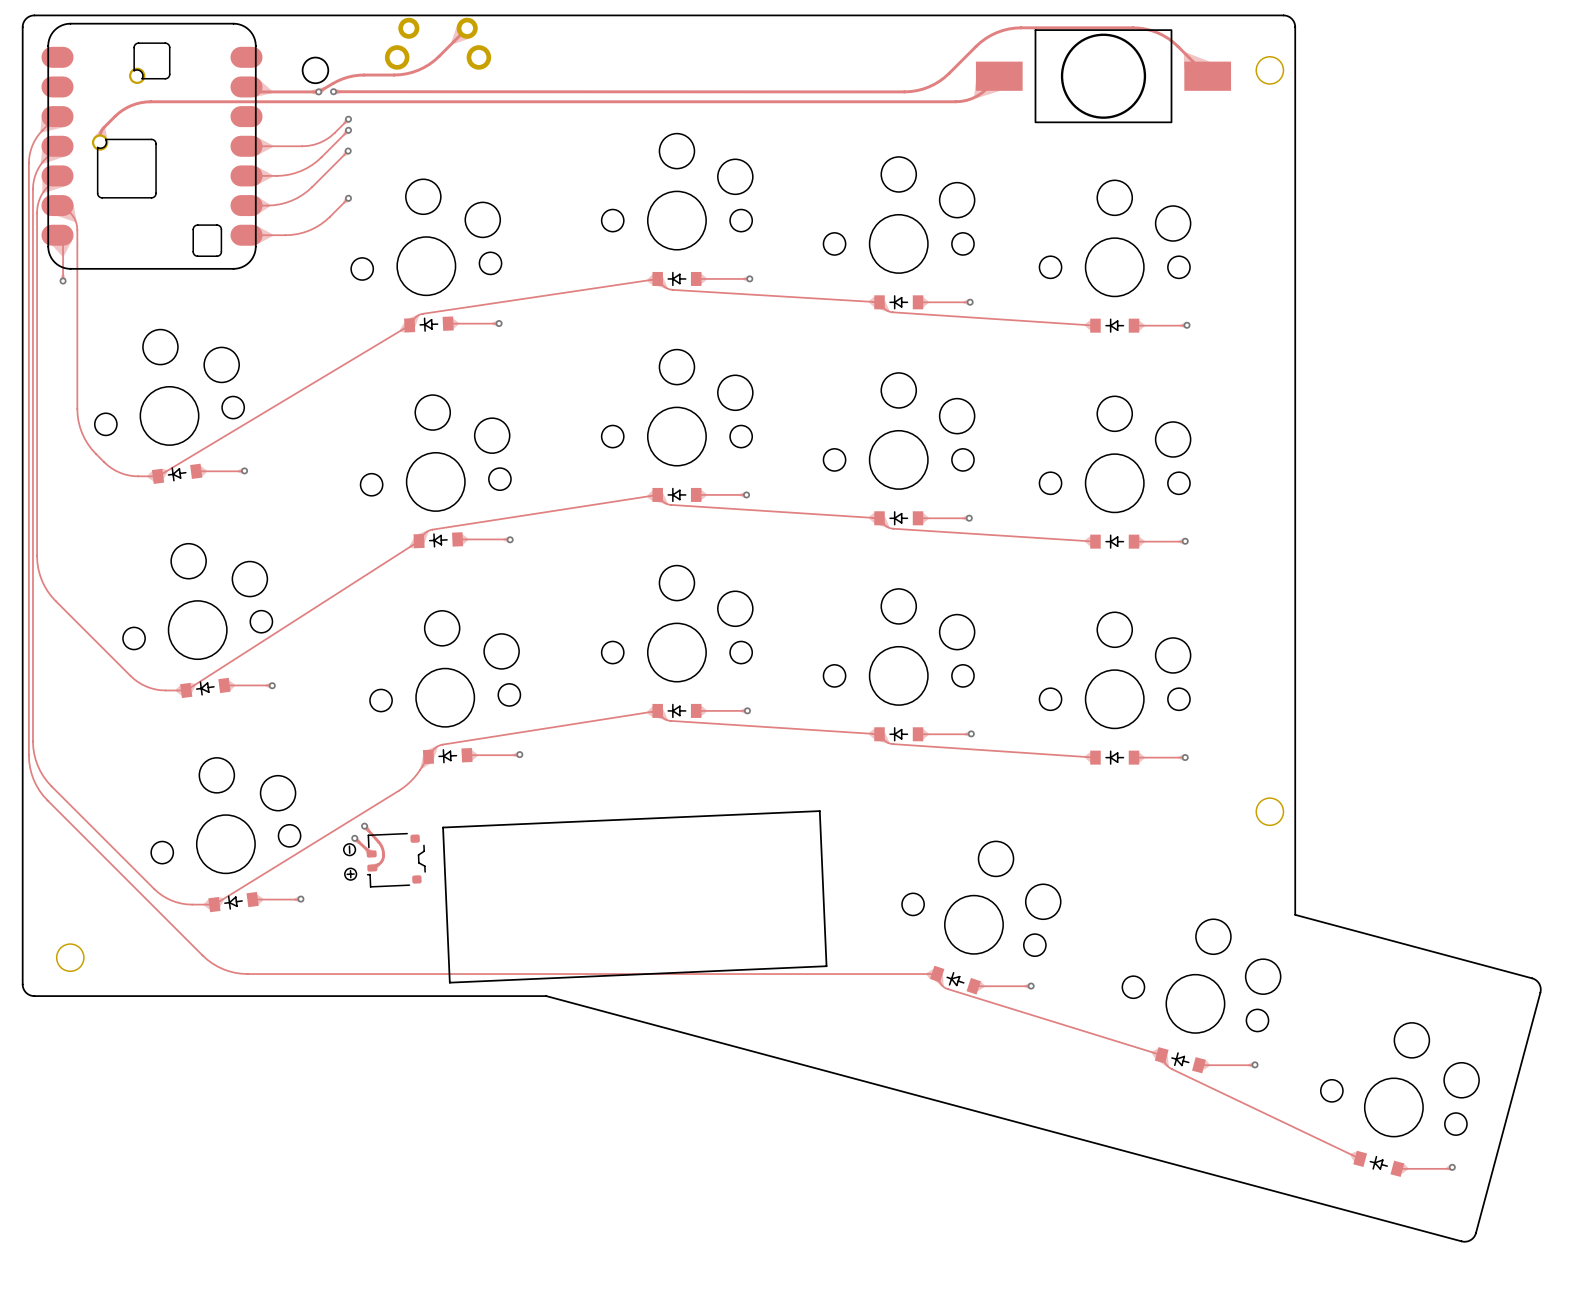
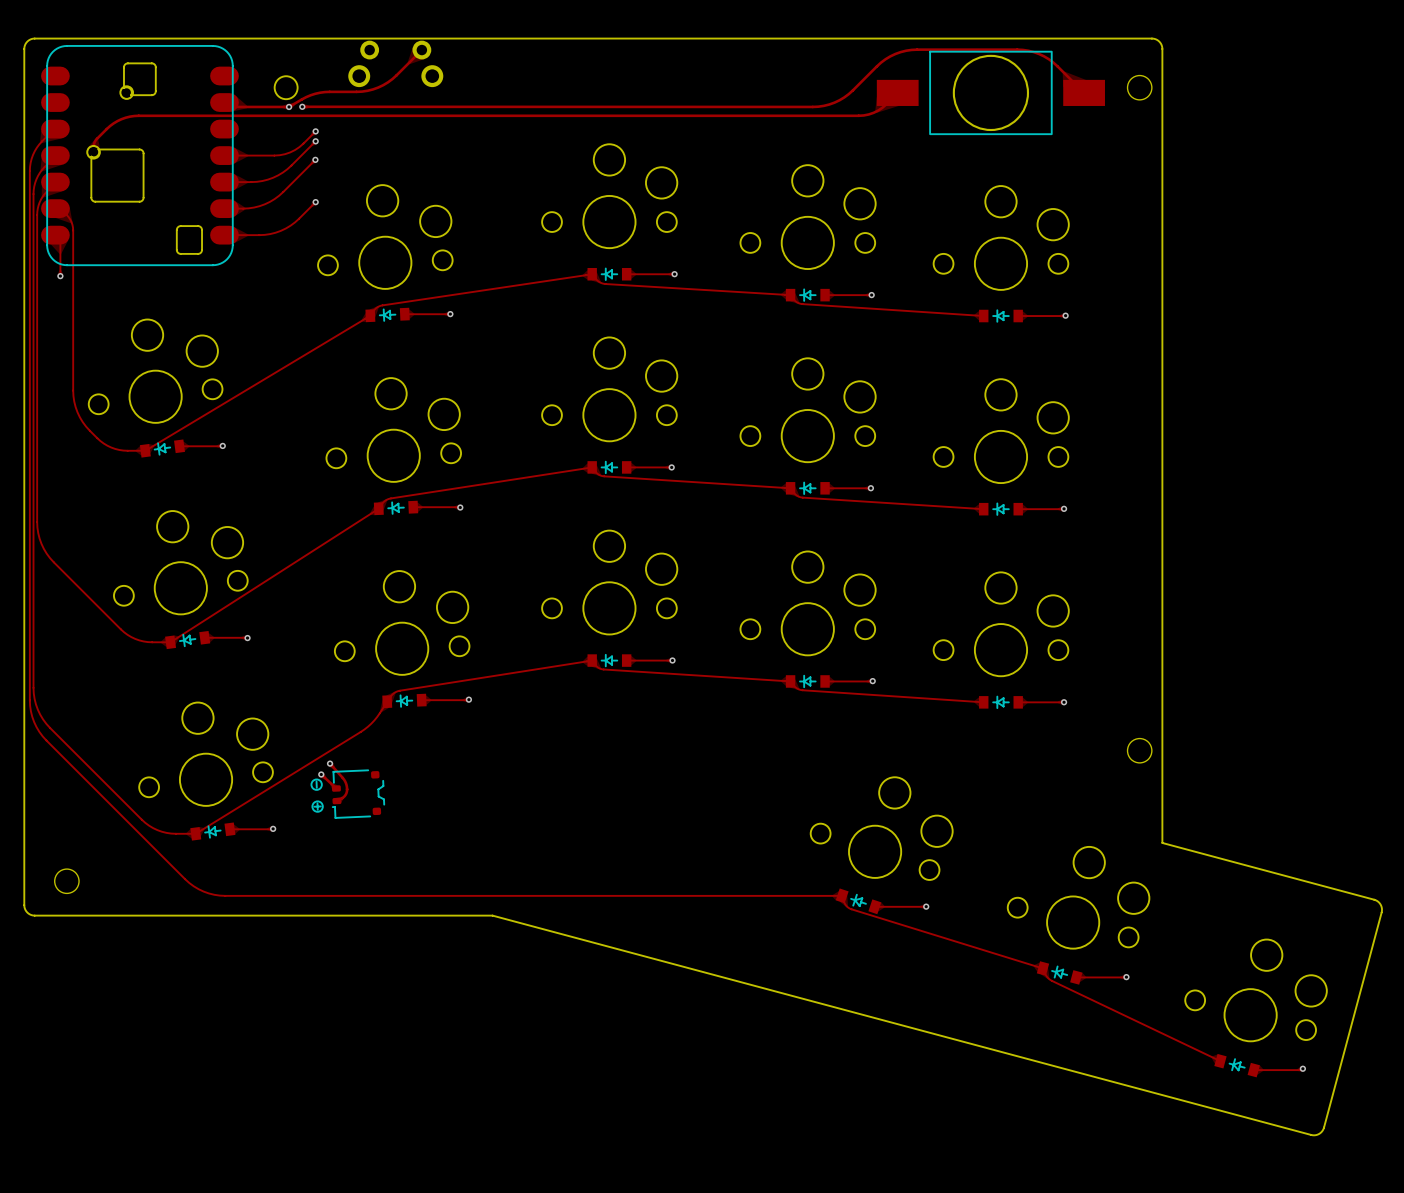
line: (819, 811) (826, 966) (449, 982) (443, 827) (819, 811) -> none

